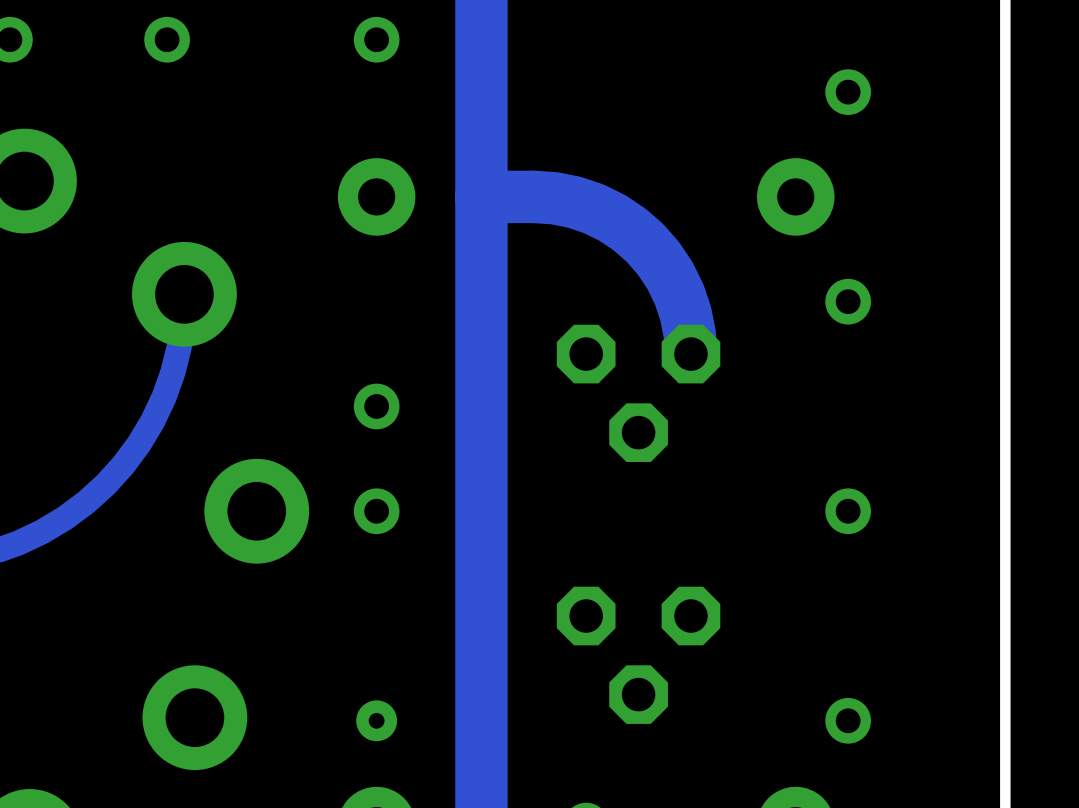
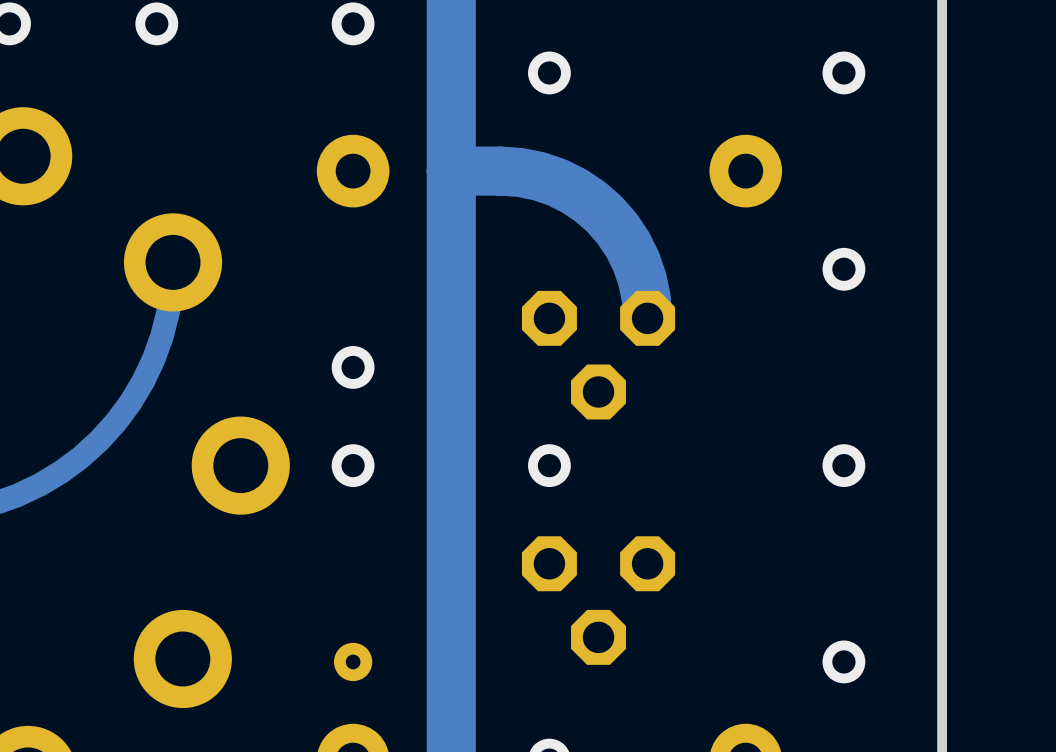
via: none -> (549, 72)
via position: (848, 92) -> (843, 72)
via position: (848, 301) -> (843, 269)
via: none -> (549, 465)
via position: (848, 511) -> (843, 465)
via position: (848, 720) -> (843, 661)

